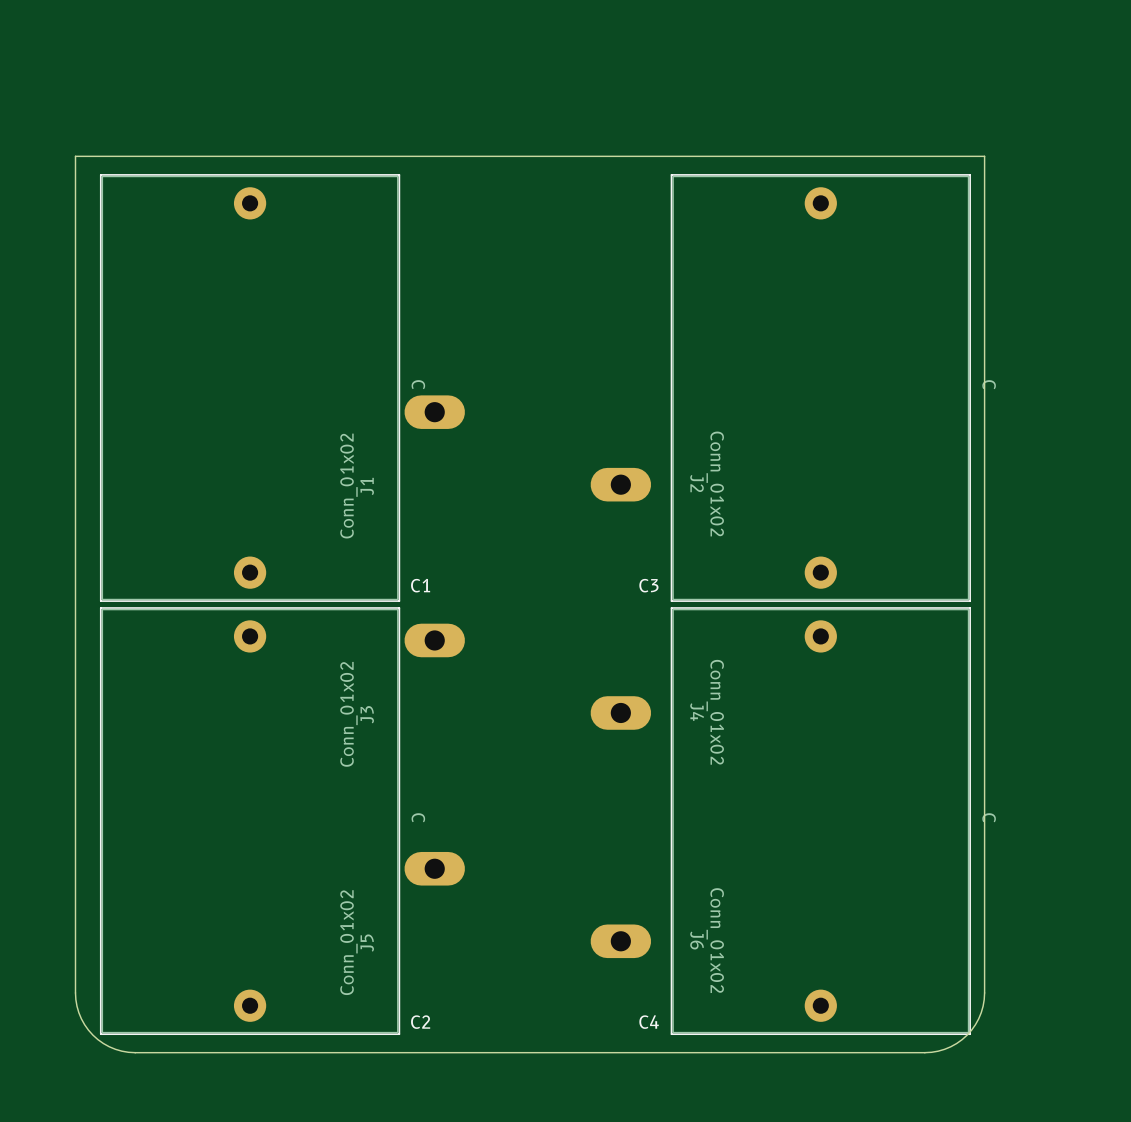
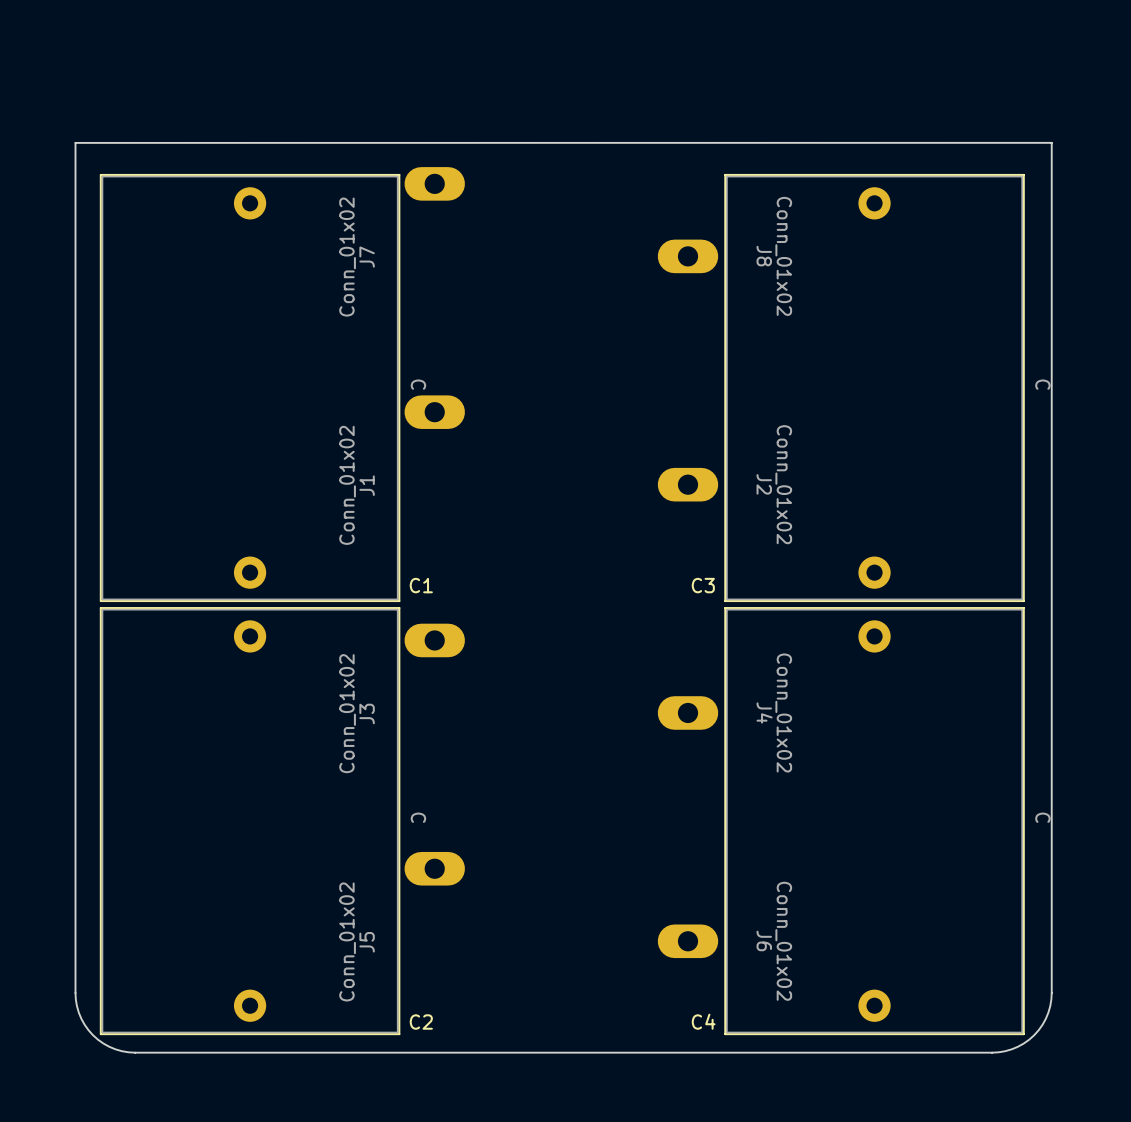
board edge: none -> (75, 142) (75, 156)
board edge: (75, 156) (984, 156) (984, 999) (978, 1018) (962, 1039) (944, 1049) (924, 1052) -> (75, 142) (1051, 142) (1051, 999) (1042, 1024) (1029, 1039) (1017, 1046) (998, 1052) (924, 1052)
J7: none -> Conn_01x02 (434, 183)
J8: none -> Conn_01x02 (688, 256)
C3 position: (820, 387) -> (874, 387)
J2 position: (620, 484) -> (688, 484)
J4 position: (620, 712) -> (688, 712)
C4 position: (820, 821) -> (874, 821)
J6 position: (620, 941) -> (688, 941)

